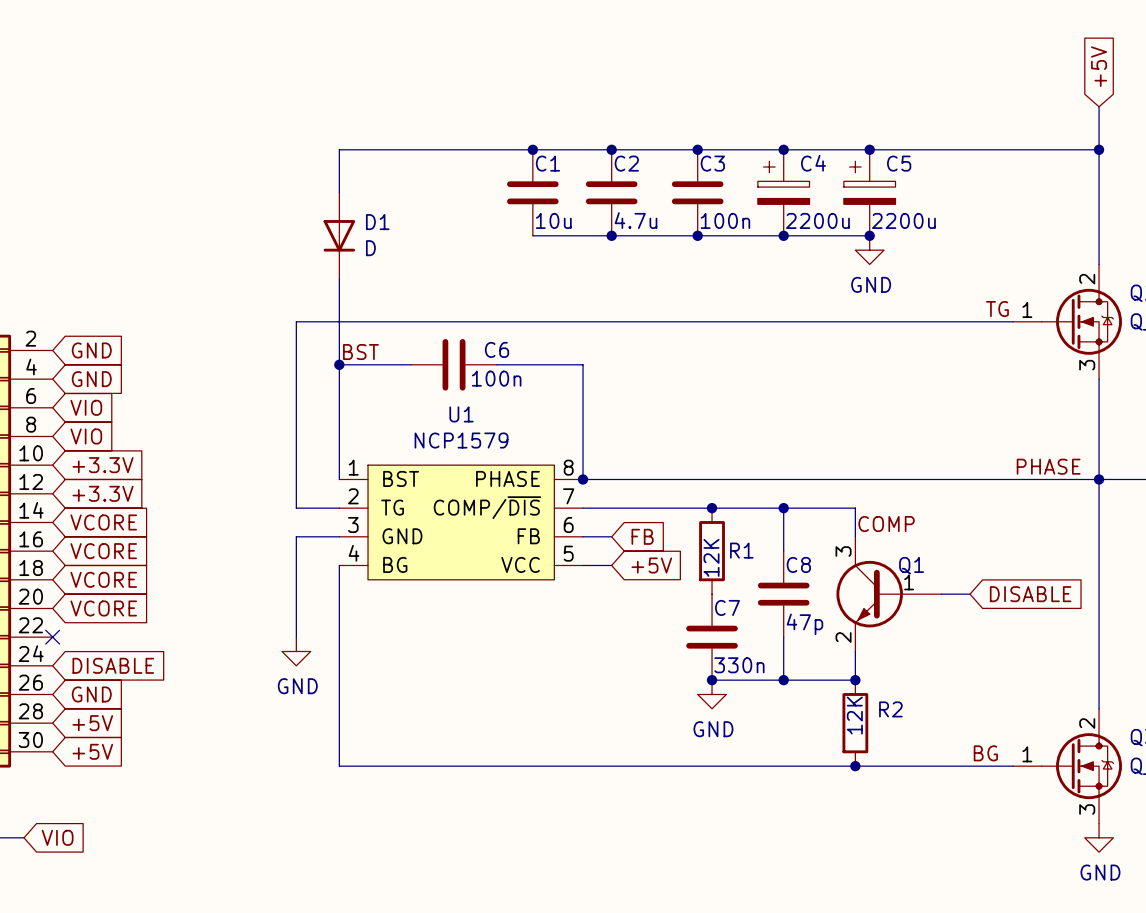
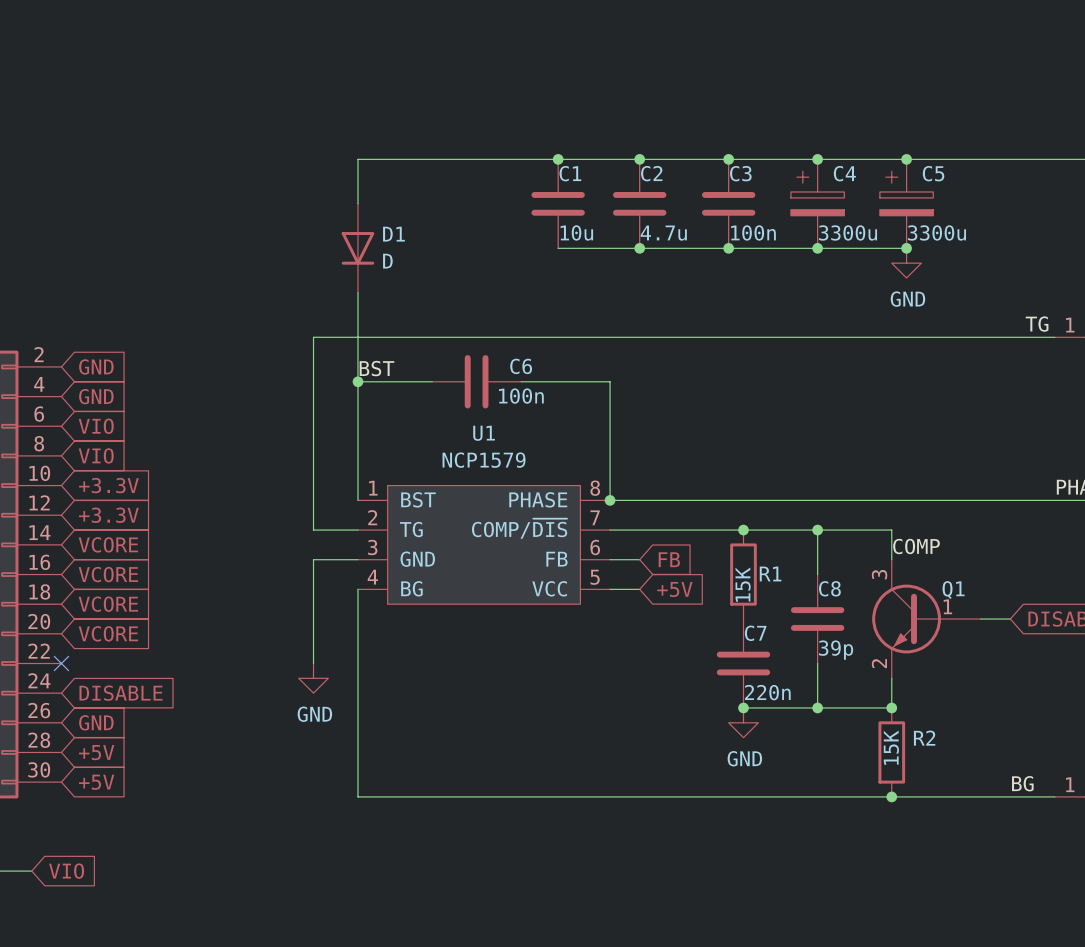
C4 value: 2200u (817, 220) -> 3300u (848, 232)
C5 value: 2200u (903, 220) -> 3300u (936, 232)
R1 value: 12K (711, 557) -> 15K (743, 584)
C8 value: 47p (804, 624) -> 39p (836, 650)
C7 value: 330n (739, 665) -> 220n (767, 692)
R2 value: 12K (854, 715) -> 15K (891, 747)

